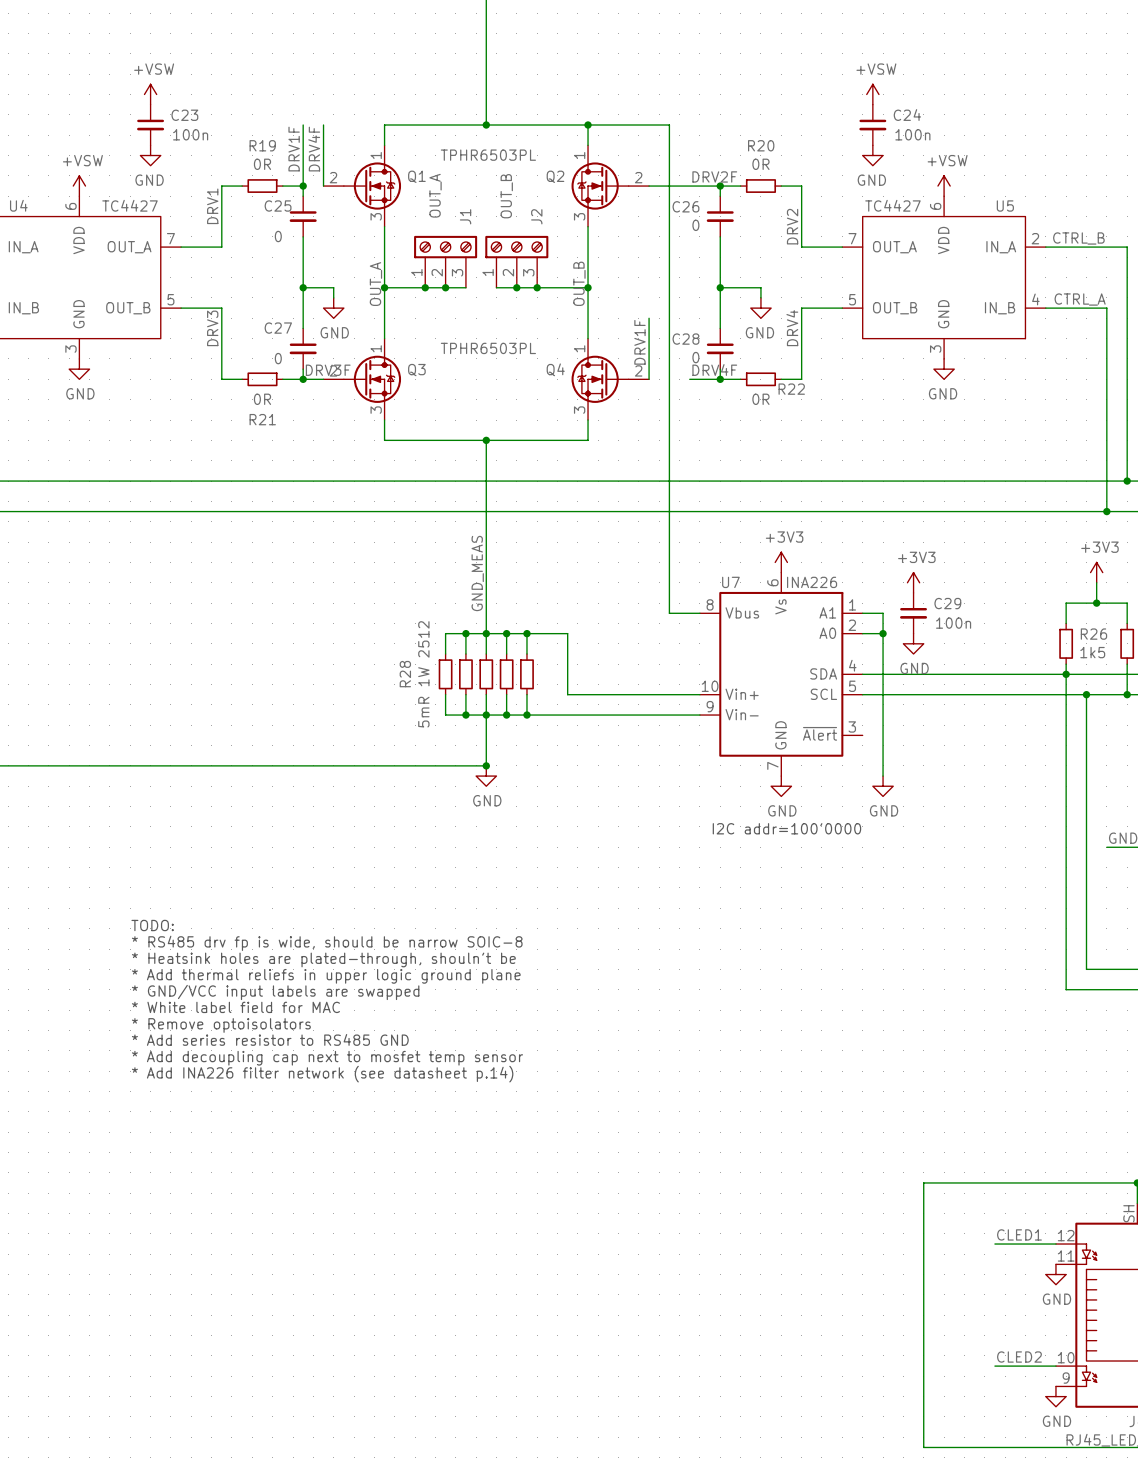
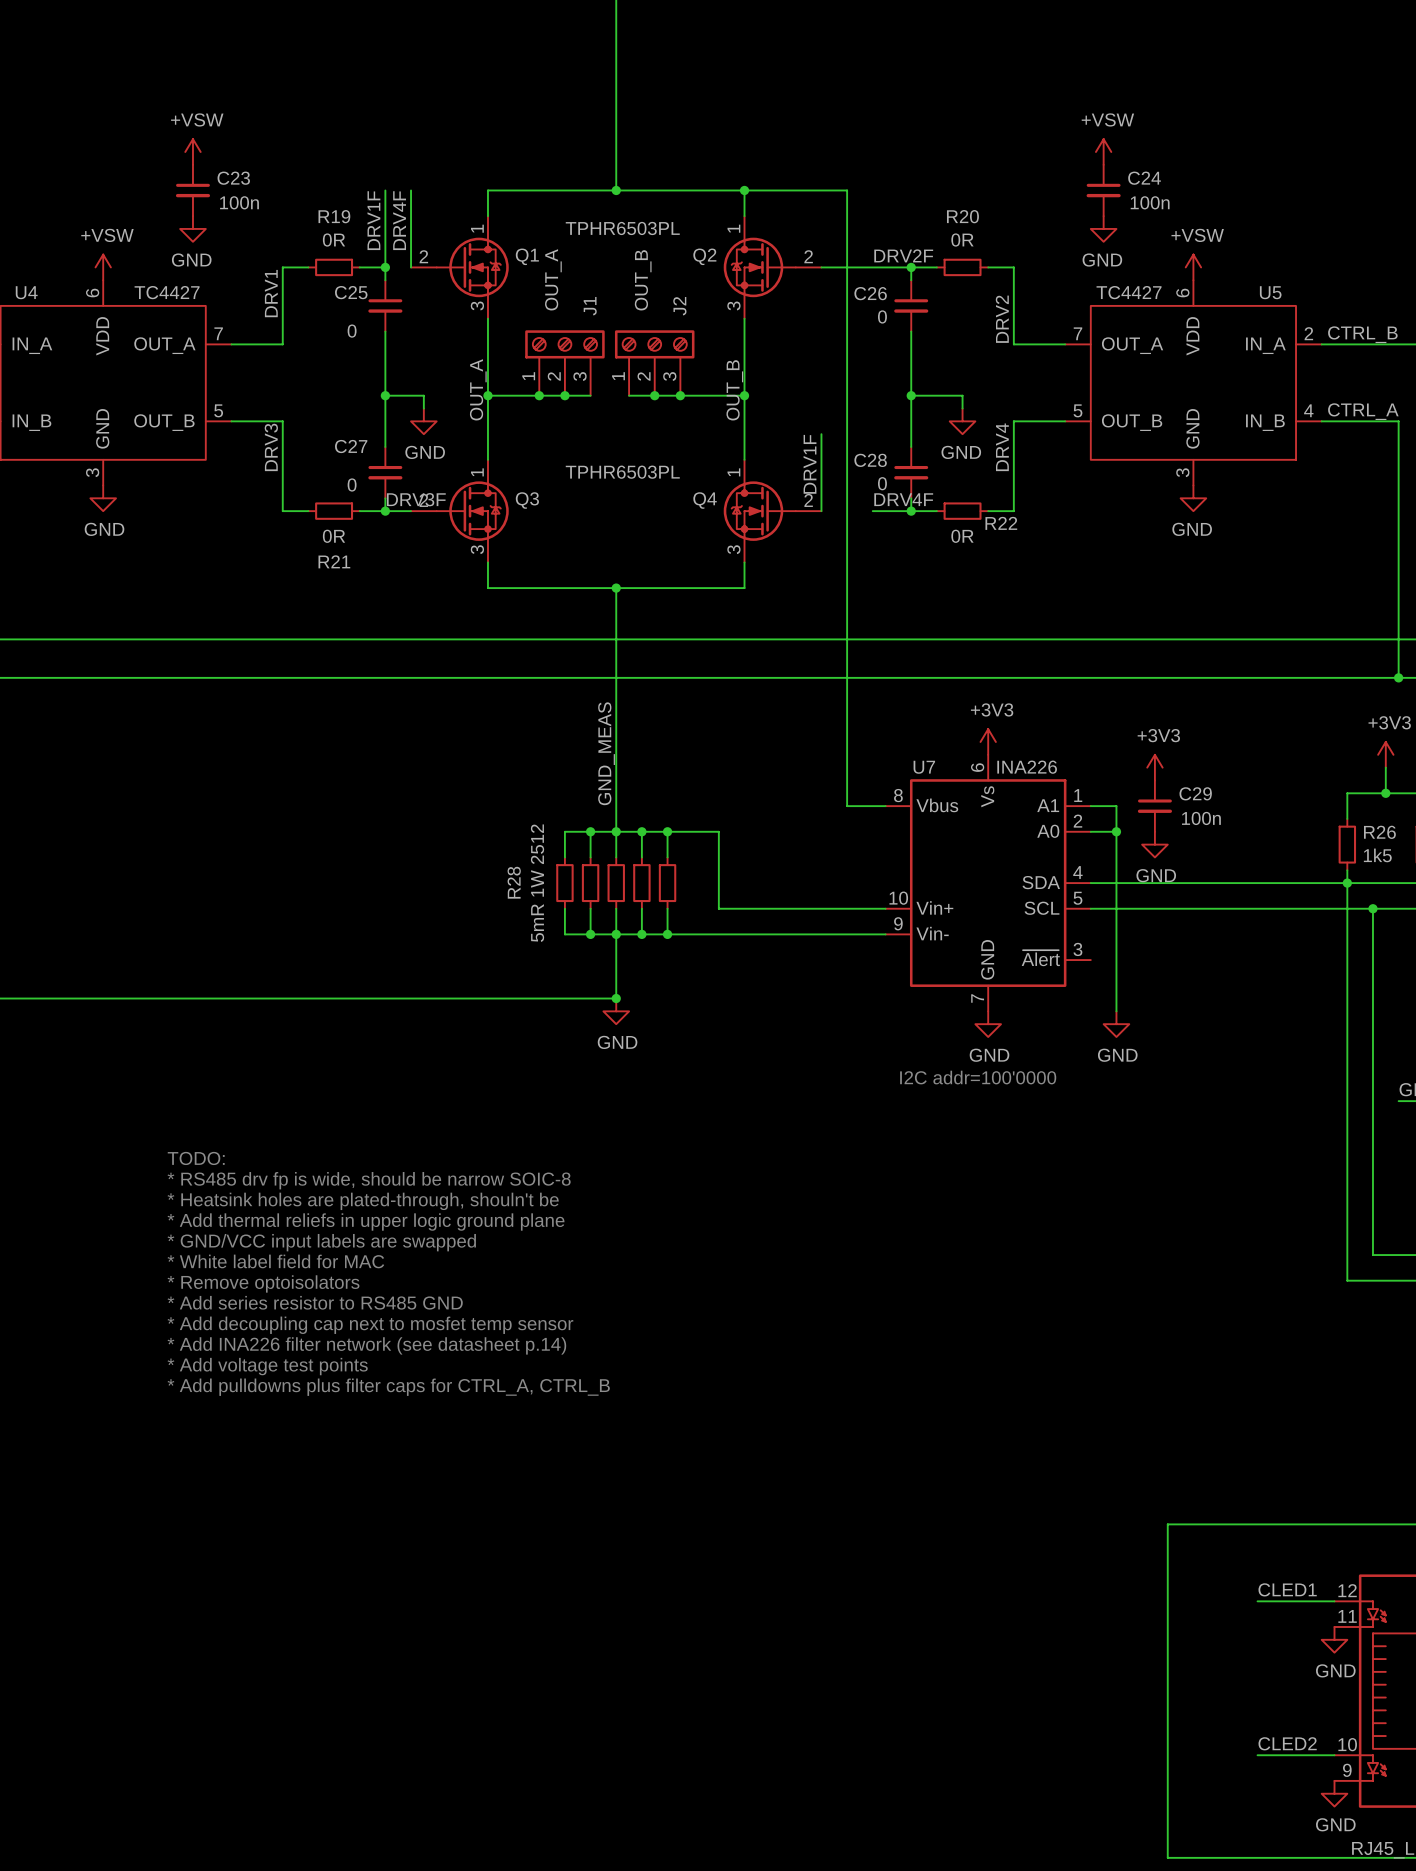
text: none -> TODO: (196, 1158)
text: none -> * RS485 drv fp is wide, should be narrow SOIC-8 (369, 1180)
text: TODO: (152, 925) -> * Heatsink holes are plated-through, shouln't be (363, 1201)
text: * RS485 drv fp is wide, should be narrow SOIC-8 (327, 943) -> * Add thermal reliefs in upper logic ground plane (366, 1222)
text: * Heatsink holes are plated-through, shouln't be (323, 959) -> * GND/VCC input labels are swapped (321, 1242)
text: * Add thermal reliefs in upper logic ground plane (326, 976) -> * White label field for MAC (275, 1261)
text: * GND/VCC input labels are swapped (275, 992) -> * Remove optoisolators (263, 1283)
text: * White label field for MAC (235, 1007) -> * Add series resistor to RS485 GND (315, 1302)
text: * Remove optoisolators (221, 1025) -> * Add decoupling cap next to mosfet temp sensor (370, 1325)
text: * Add series resistor to RS485 GND (270, 1039) -> * Add INA226 filter network (see datasheet p.14) (366, 1345)
text: * Add decoupling cap next to mosfet temp sensor (327, 1058) -> * Add voltage test points (267, 1366)
text: * Add INA226 filter network (see datasheet p.14) (322, 1074) -> * Add pulldowns plus filter caps for CTRL_A, CTRL_B (388, 1387)

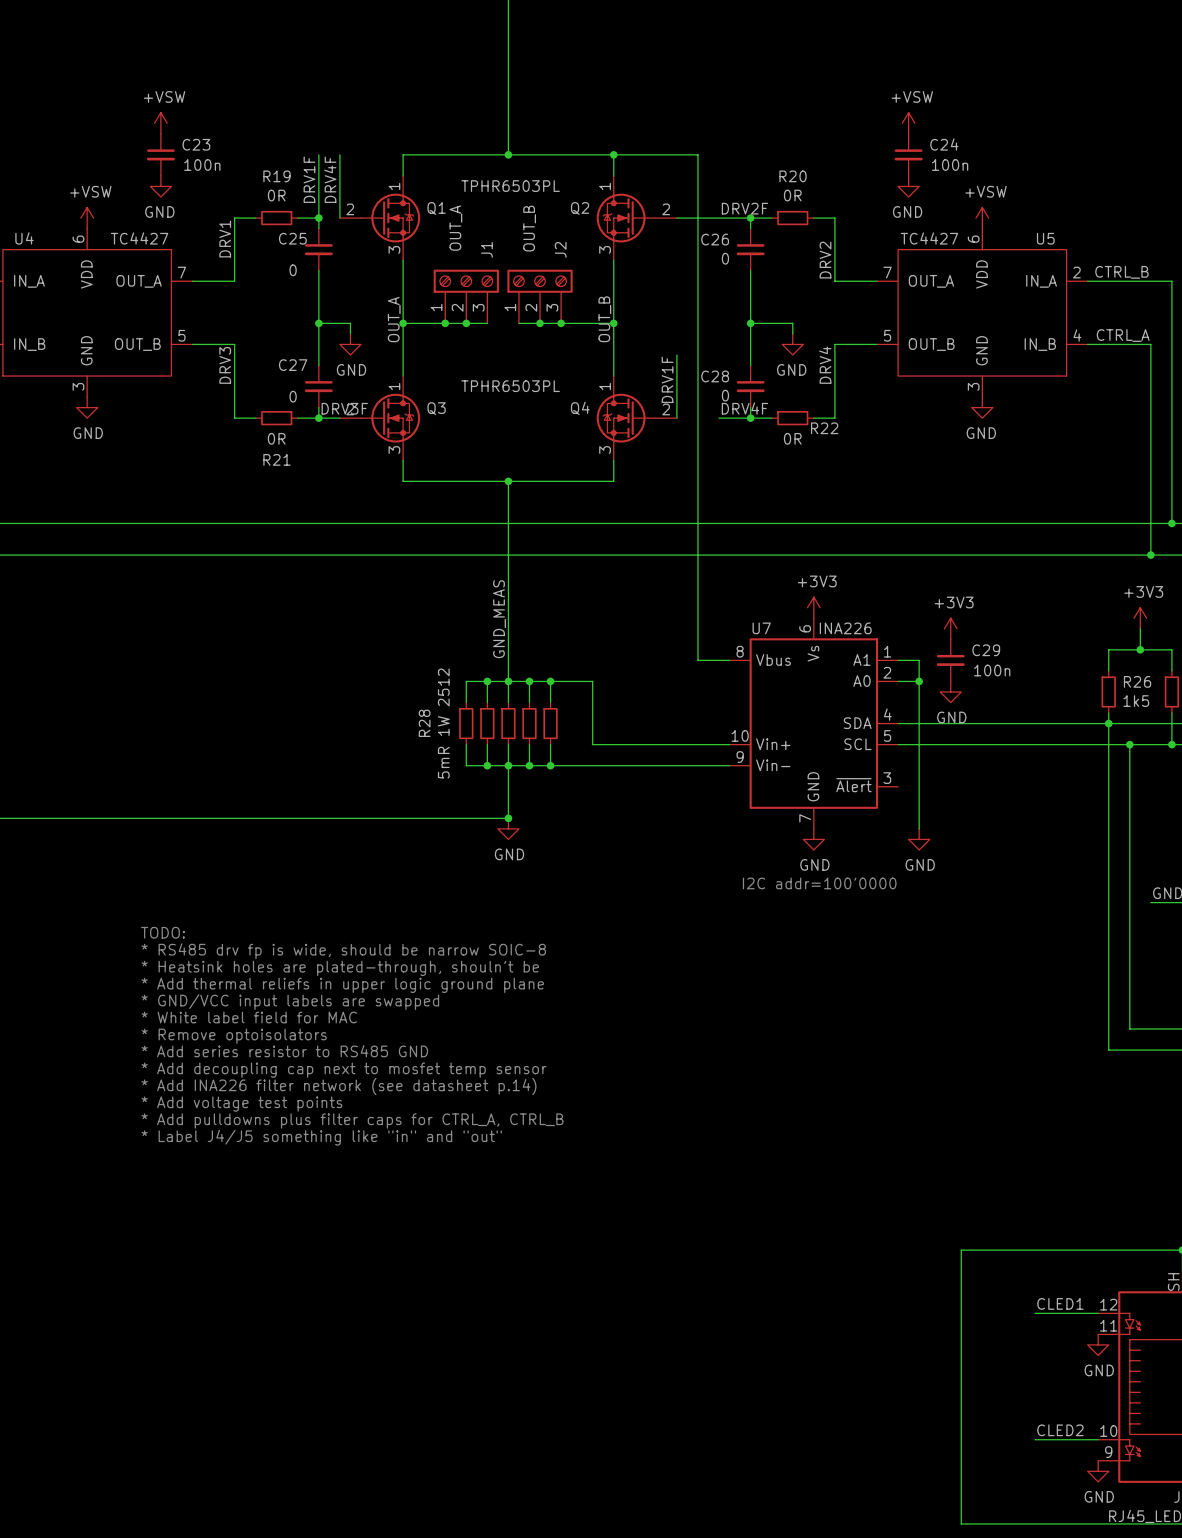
text: none -> TODO: (162, 932)
text: TODO: (196, 1158) -> * RS485 drv fp is wide, should be narrow SOIC-8 (343, 951)
text: * RS485 drv fp is wide, should be narrow SOIC-8 (369, 1180) -> * Heatsink holes are plated-through, shouln't be (340, 968)
text: * Heatsink holes are plated-through, shouln't be (363, 1201) -> * Add thermal reliefs in upper logic ground plane (342, 985)
text: * Add thermal reliefs in upper logic ground plane (366, 1222) -> * GND/VCC input labels are swapped (290, 1002)
text: * GND/VCC input labels are swapped (321, 1242) -> * White label field for MAC (249, 1017)
text: * White label field for MAC (275, 1261) -> * Remove optoisolators (234, 1036)
text: * Remove optoisolators (263, 1283) -> * Add series resistor to RS485 GND (284, 1051)
text: * Add series resistor to RS485 GND (315, 1302) -> * Add decoupling cap next to mosfet temp sensor (344, 1070)
text: * Add decoupling cap next to mosfet temp sensor (370, 1325) -> * Add INA226 filter network (see datasheet p.14) (339, 1086)
text: * Add INA226 filter network (see datasheet p.14) (366, 1345) -> * Add voltage test points (241, 1104)
text: * Add voltage test points (267, 1366) -> * Add pulldowns plus filter caps for CTRL_A, CTRL_B (352, 1121)
text: * Add pulldowns plus filter caps for CTRL_A, CTRL_B (388, 1387) -> * Label J4/J5 something like "in" and "out" (321, 1137)

